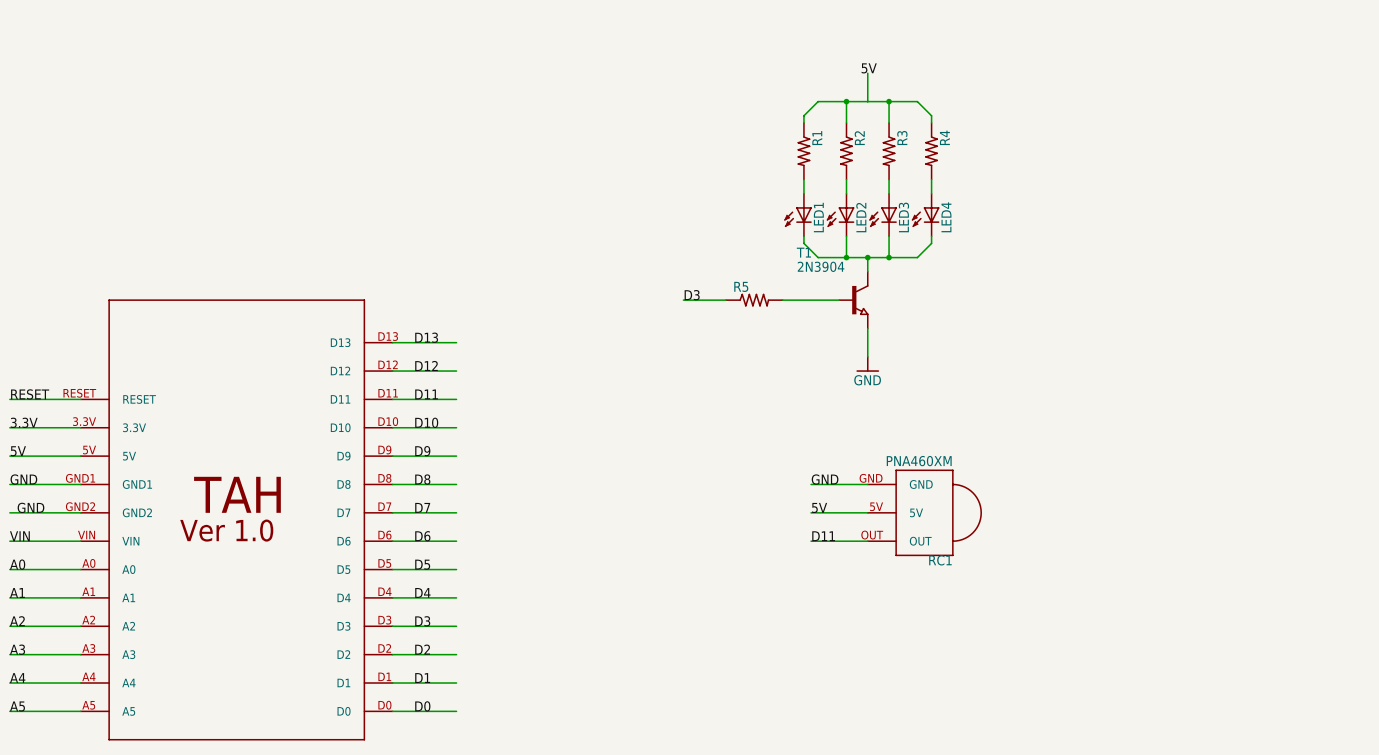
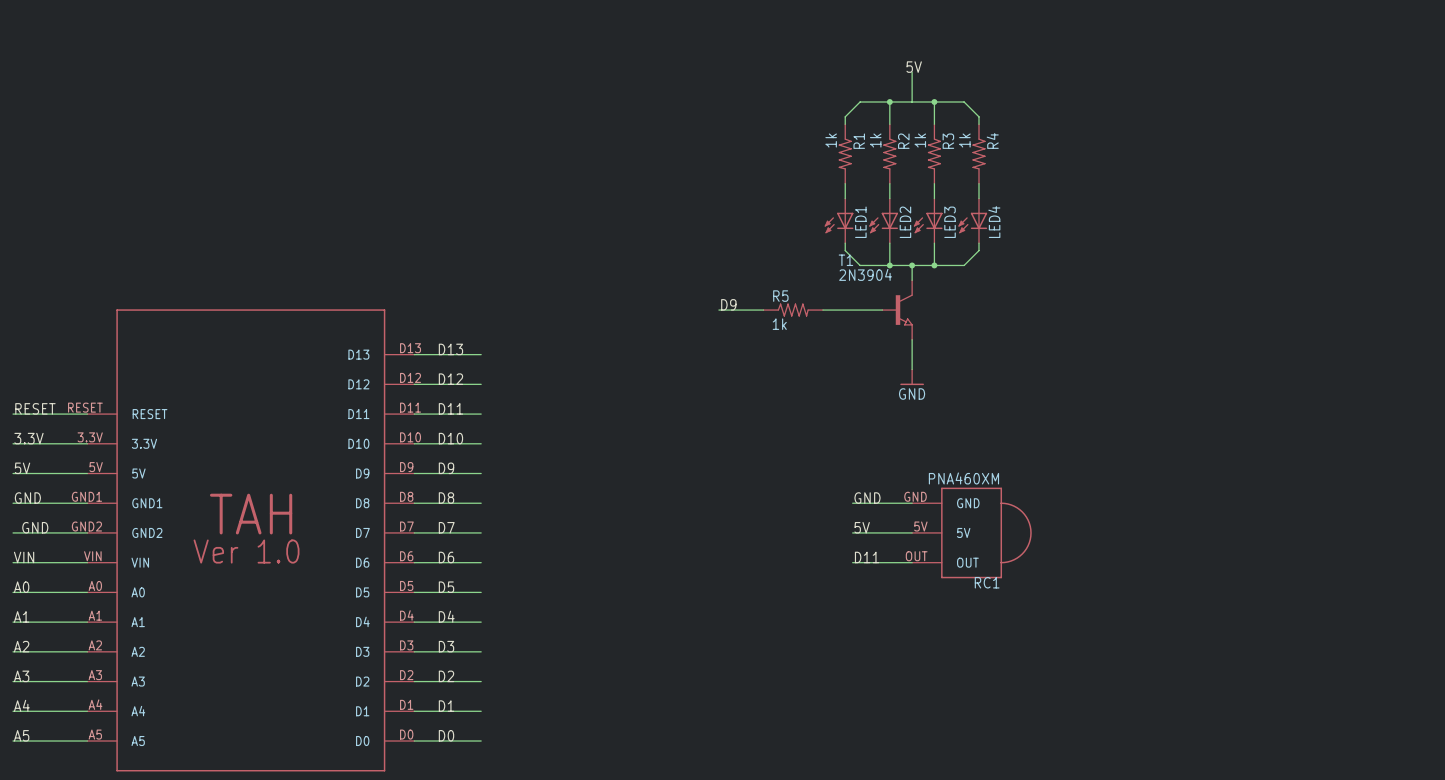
R1 value: none -> 1k (831, 140)
R2 value: none -> 1k (875, 140)
R3 value: none -> 1k (920, 140)
R4 value: none -> 1k (964, 140)
label: D3 (692, 295) -> D9 (728, 304)
R5 value: none -> 1k (779, 324)

